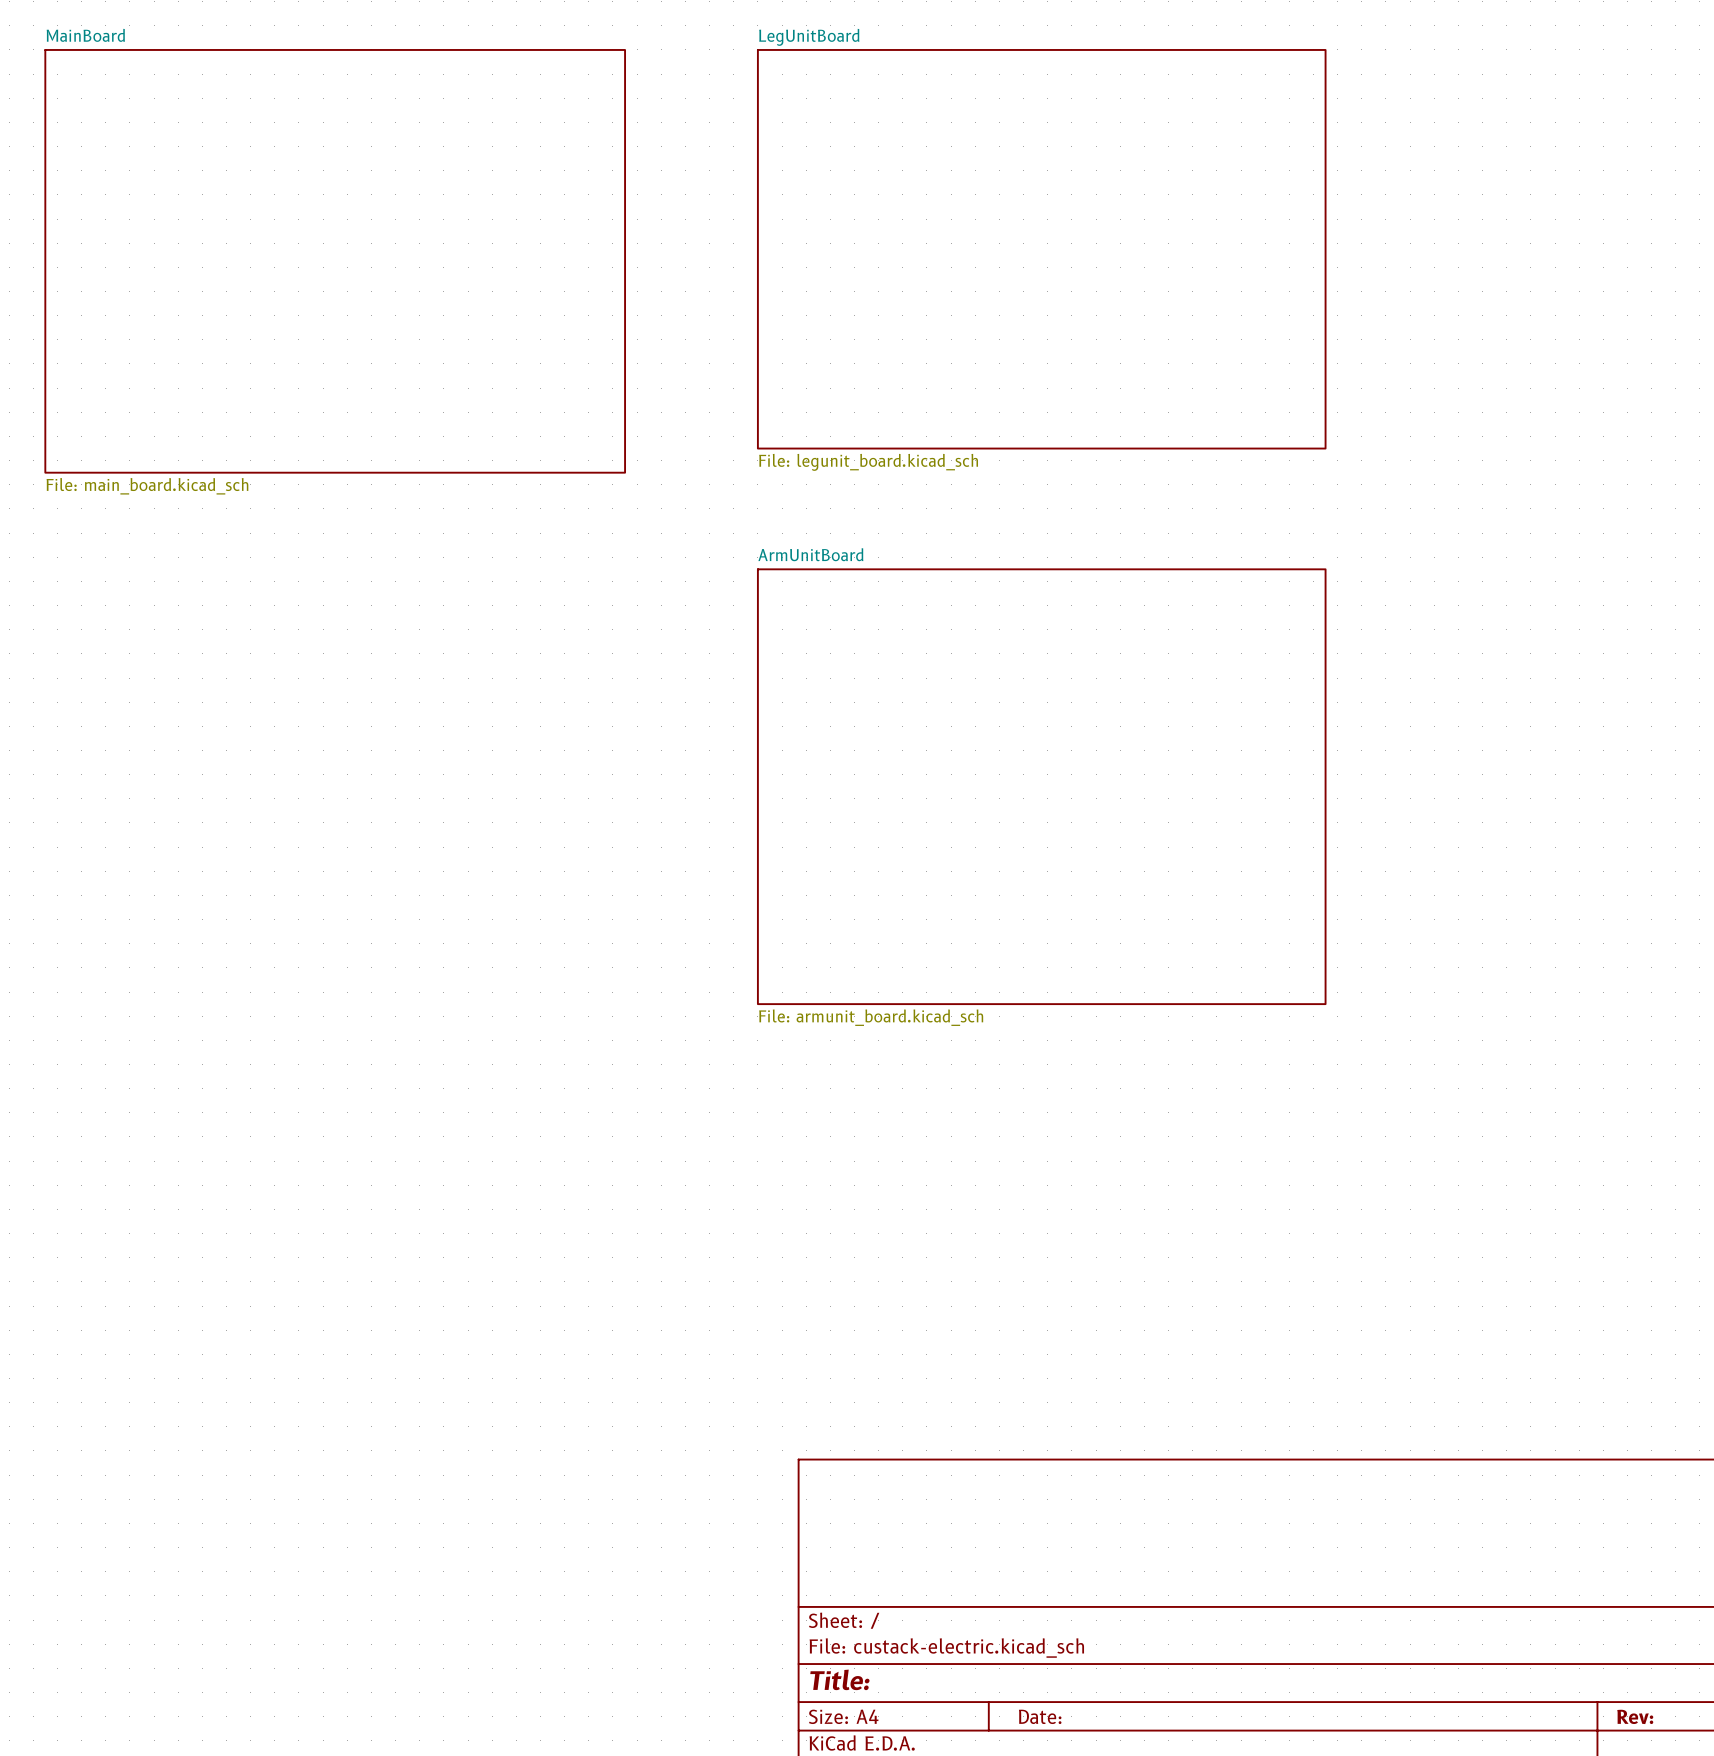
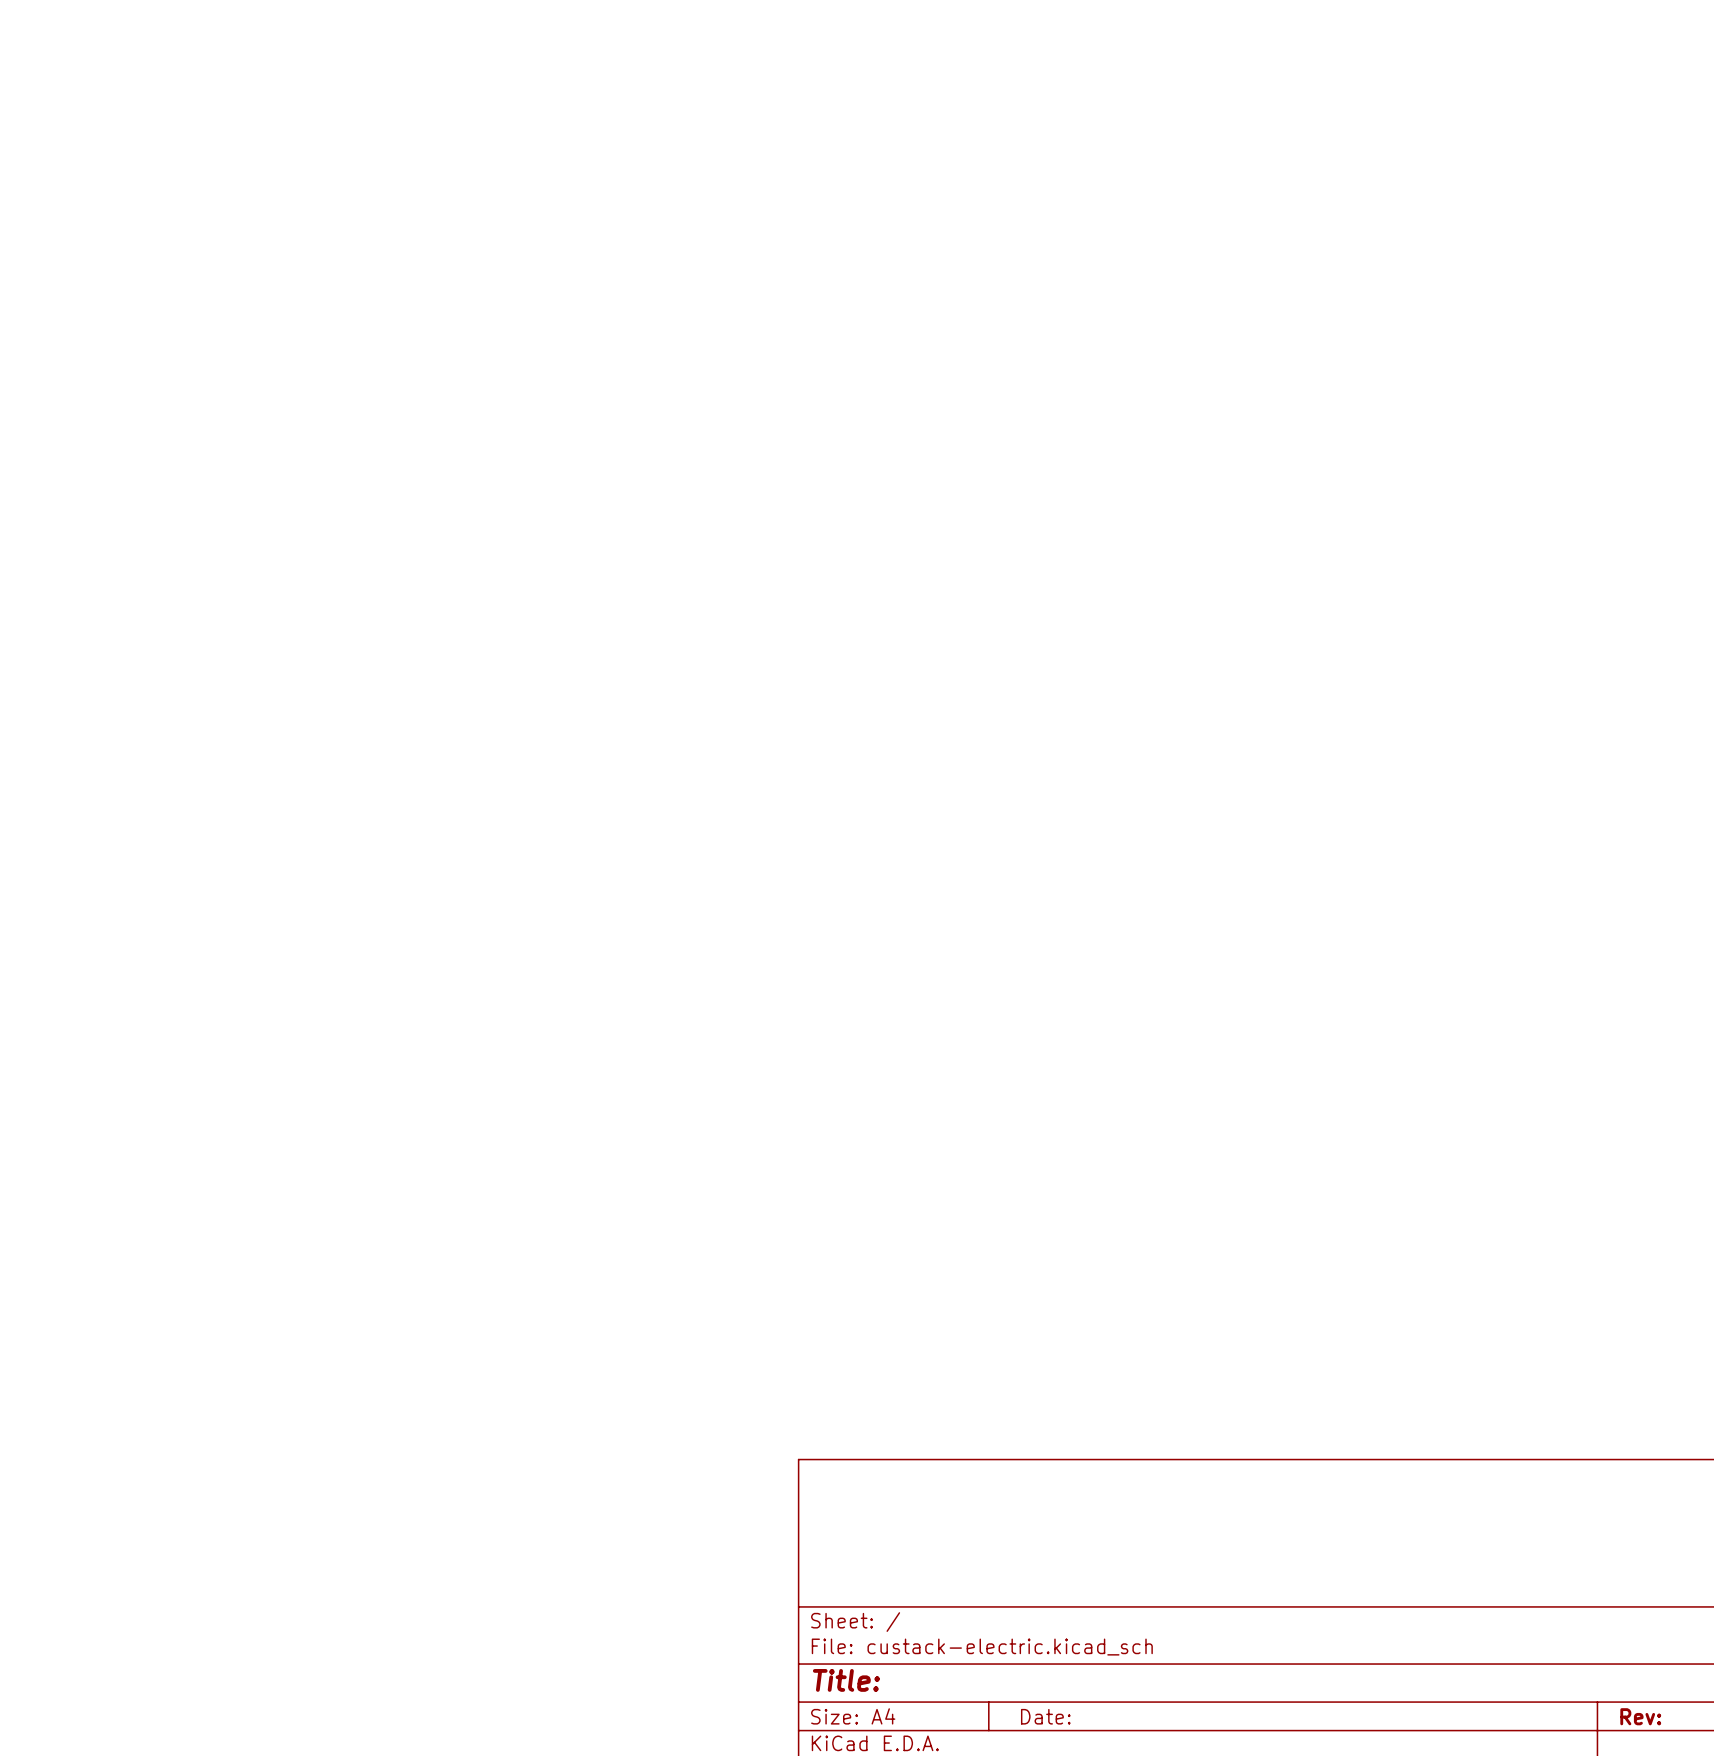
sheet LegUnitBoard: File: legunit_board.kicad_sch (1041, 249) -> none
sheet MainBoard: File: main_board.kicad_sch (335, 261) -> none
sheet ArmUnitBoard: File: armunit_board.kicad_sch (1041, 786) -> none

